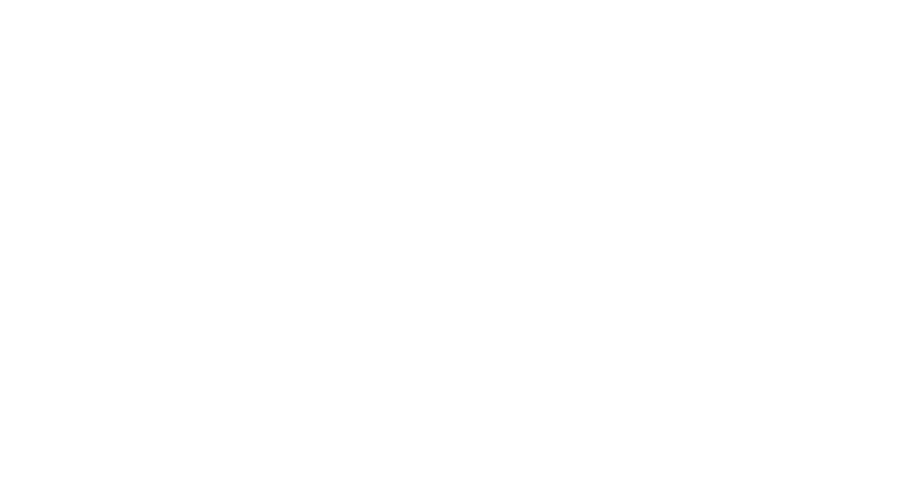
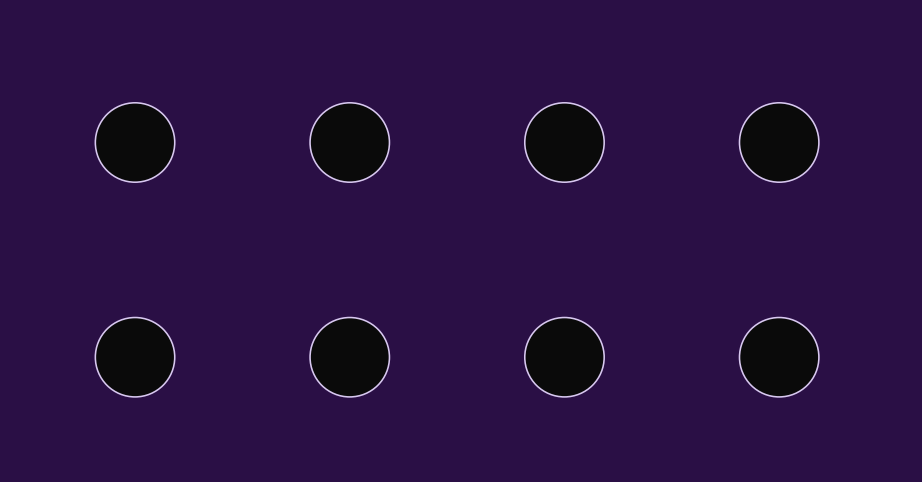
part: none -> (135, 142)
part: none -> (349, 142)
part: none -> (564, 142)
part: none -> (779, 142)
part: none -> (135, 357)
part: none -> (349, 357)
part: none -> (564, 357)
part: none -> (779, 357)

